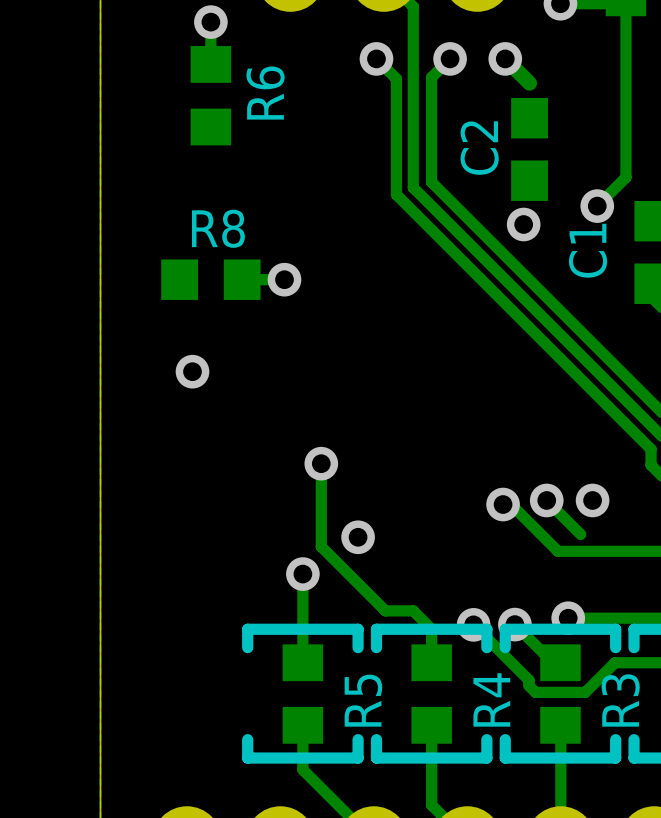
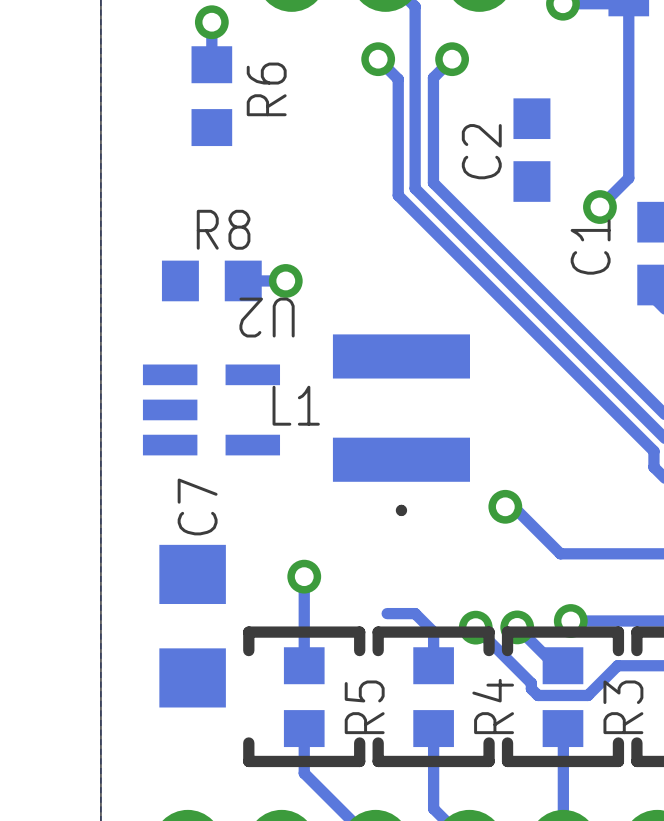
track: (505, 58) (529, 83) -> none
via: (505, 58) -> none
via: (523, 224) -> none
via: (192, 371) -> none
U2: none -> (211, 409)
L1: none -> (401, 425)
track: (321, 463) (321, 546) (385, 610) -> none
via: (321, 463) -> none
track: (546, 500) (580, 534) -> none
via: (546, 500) -> none
via: (592, 500) -> none
via: (358, 537) -> none
C7: none -> (192, 626)

